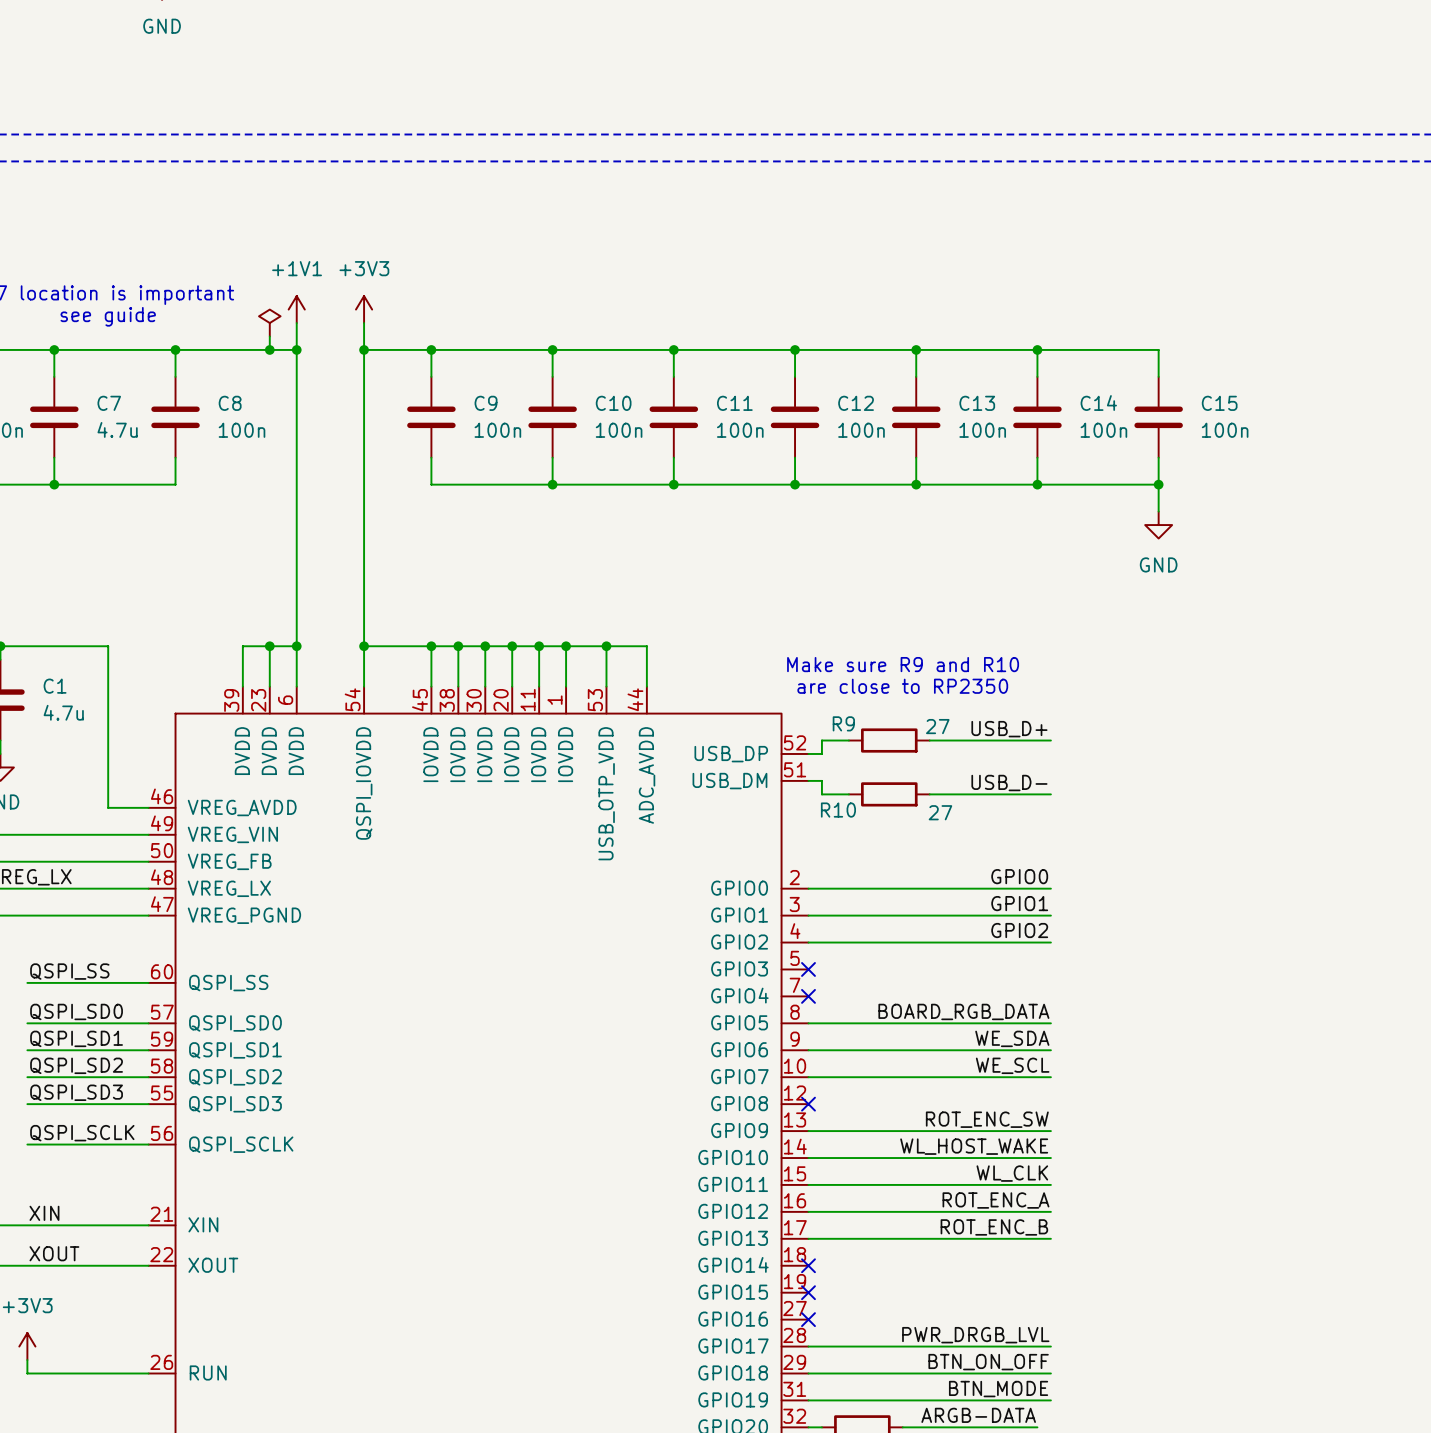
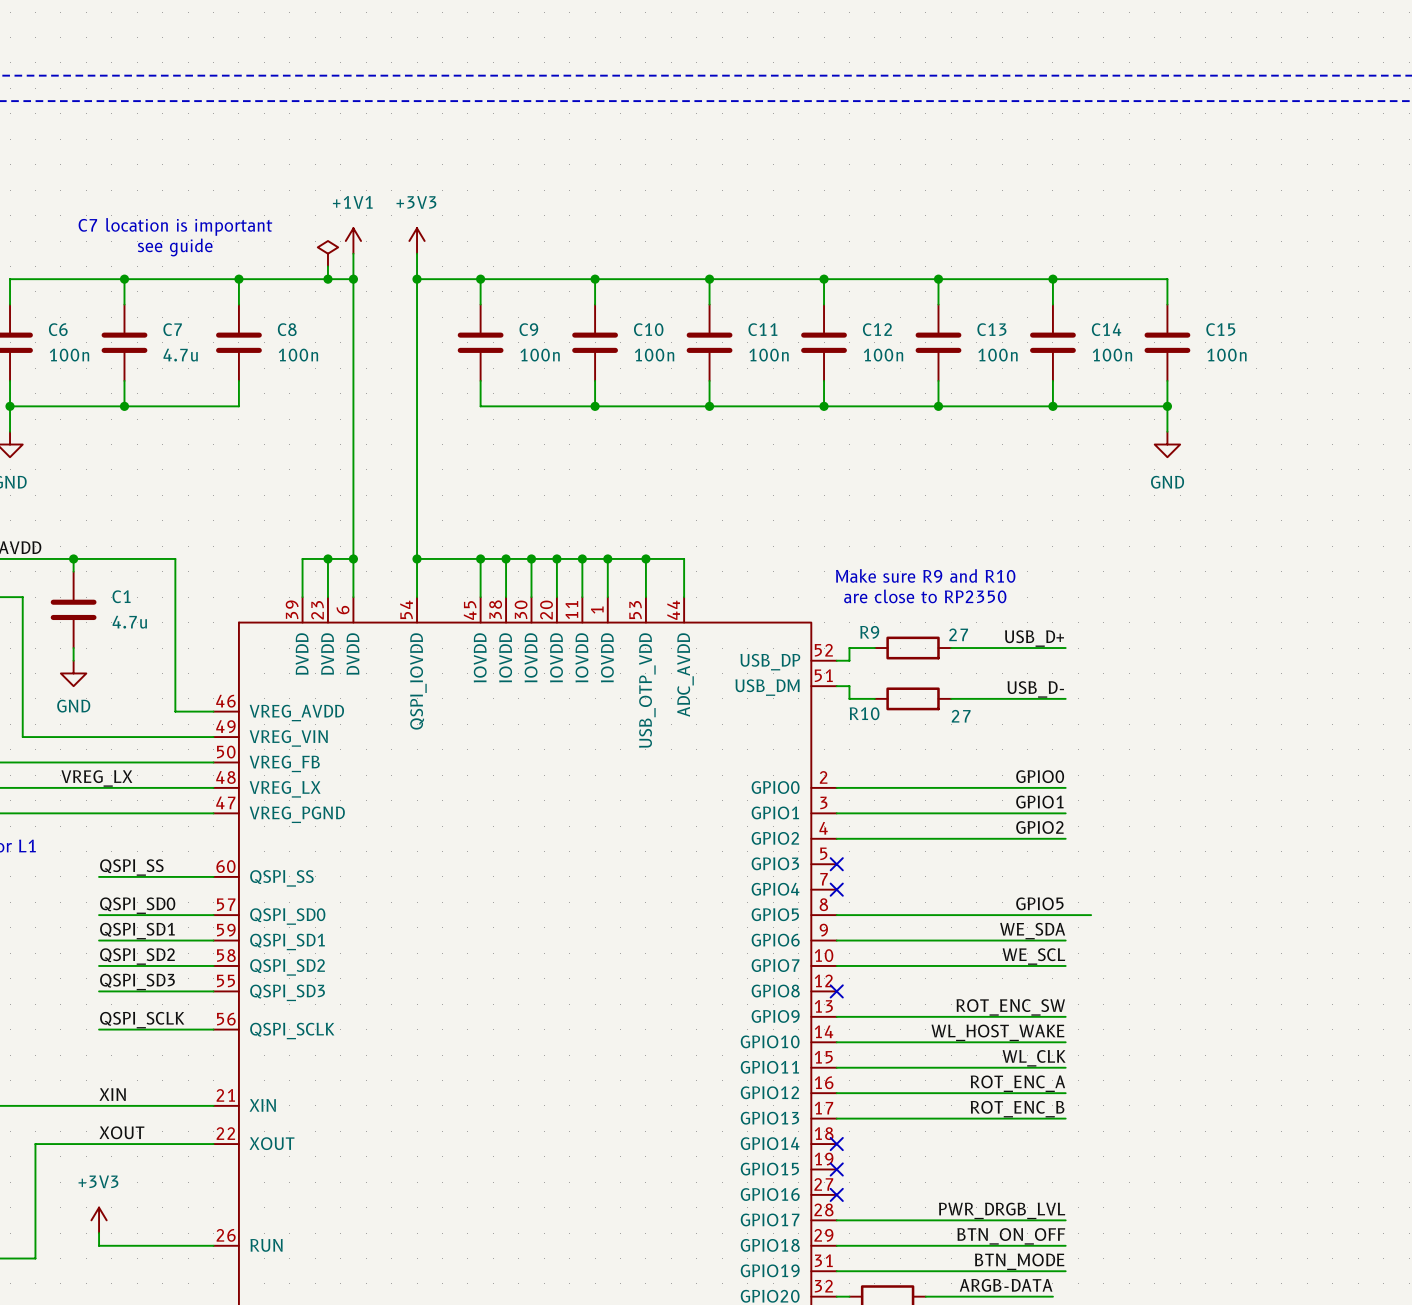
label: BOARD_RGB_DATA (963, 1011) -> GPIO5 (1039, 903)
wire: none -> (1065, 915) (1091, 915)

